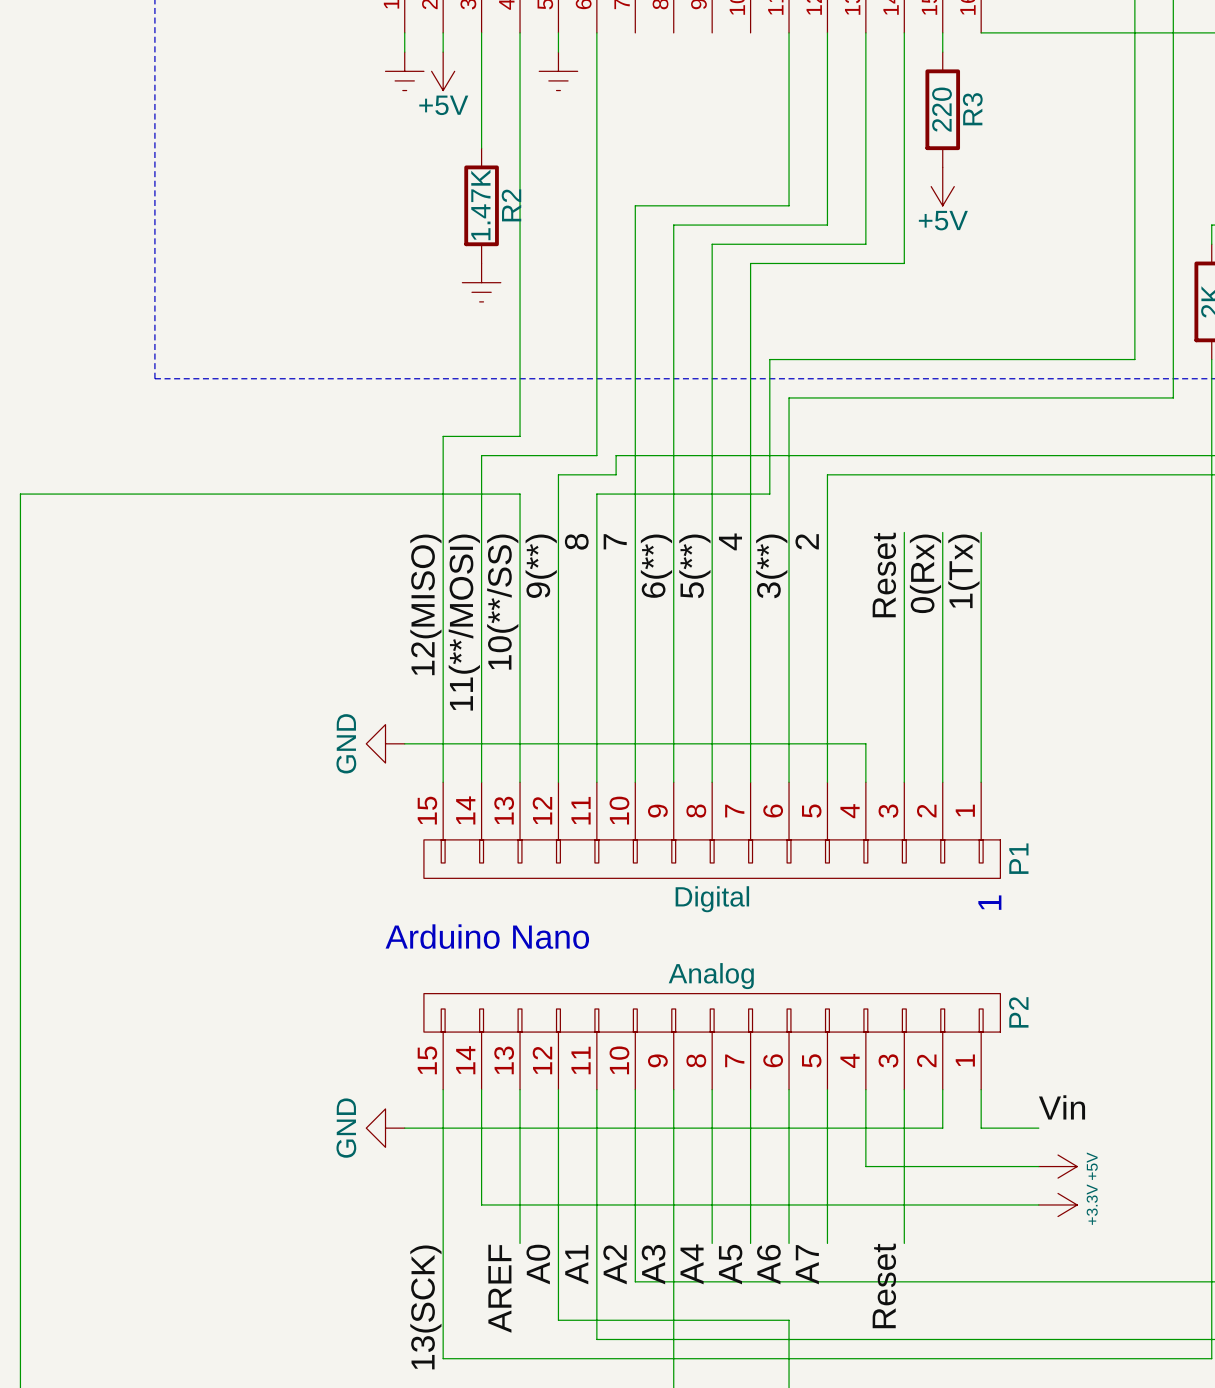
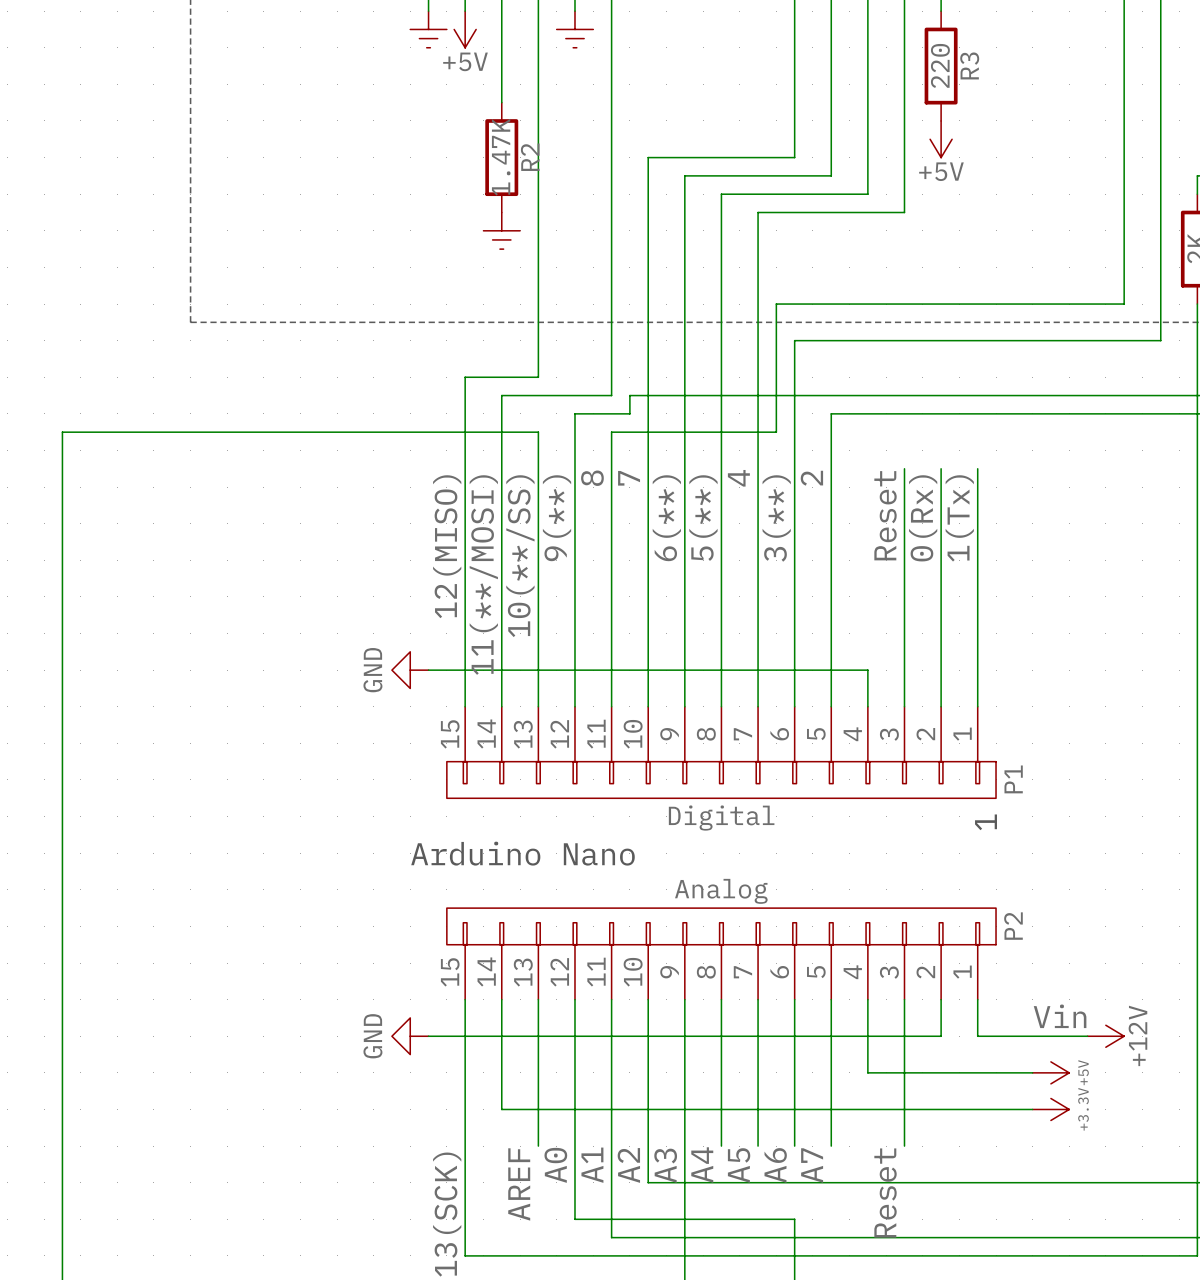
wire: none -> (1032, 1036) (1087, 1036)
power symbol: none -> +12V (1105, 1036)

